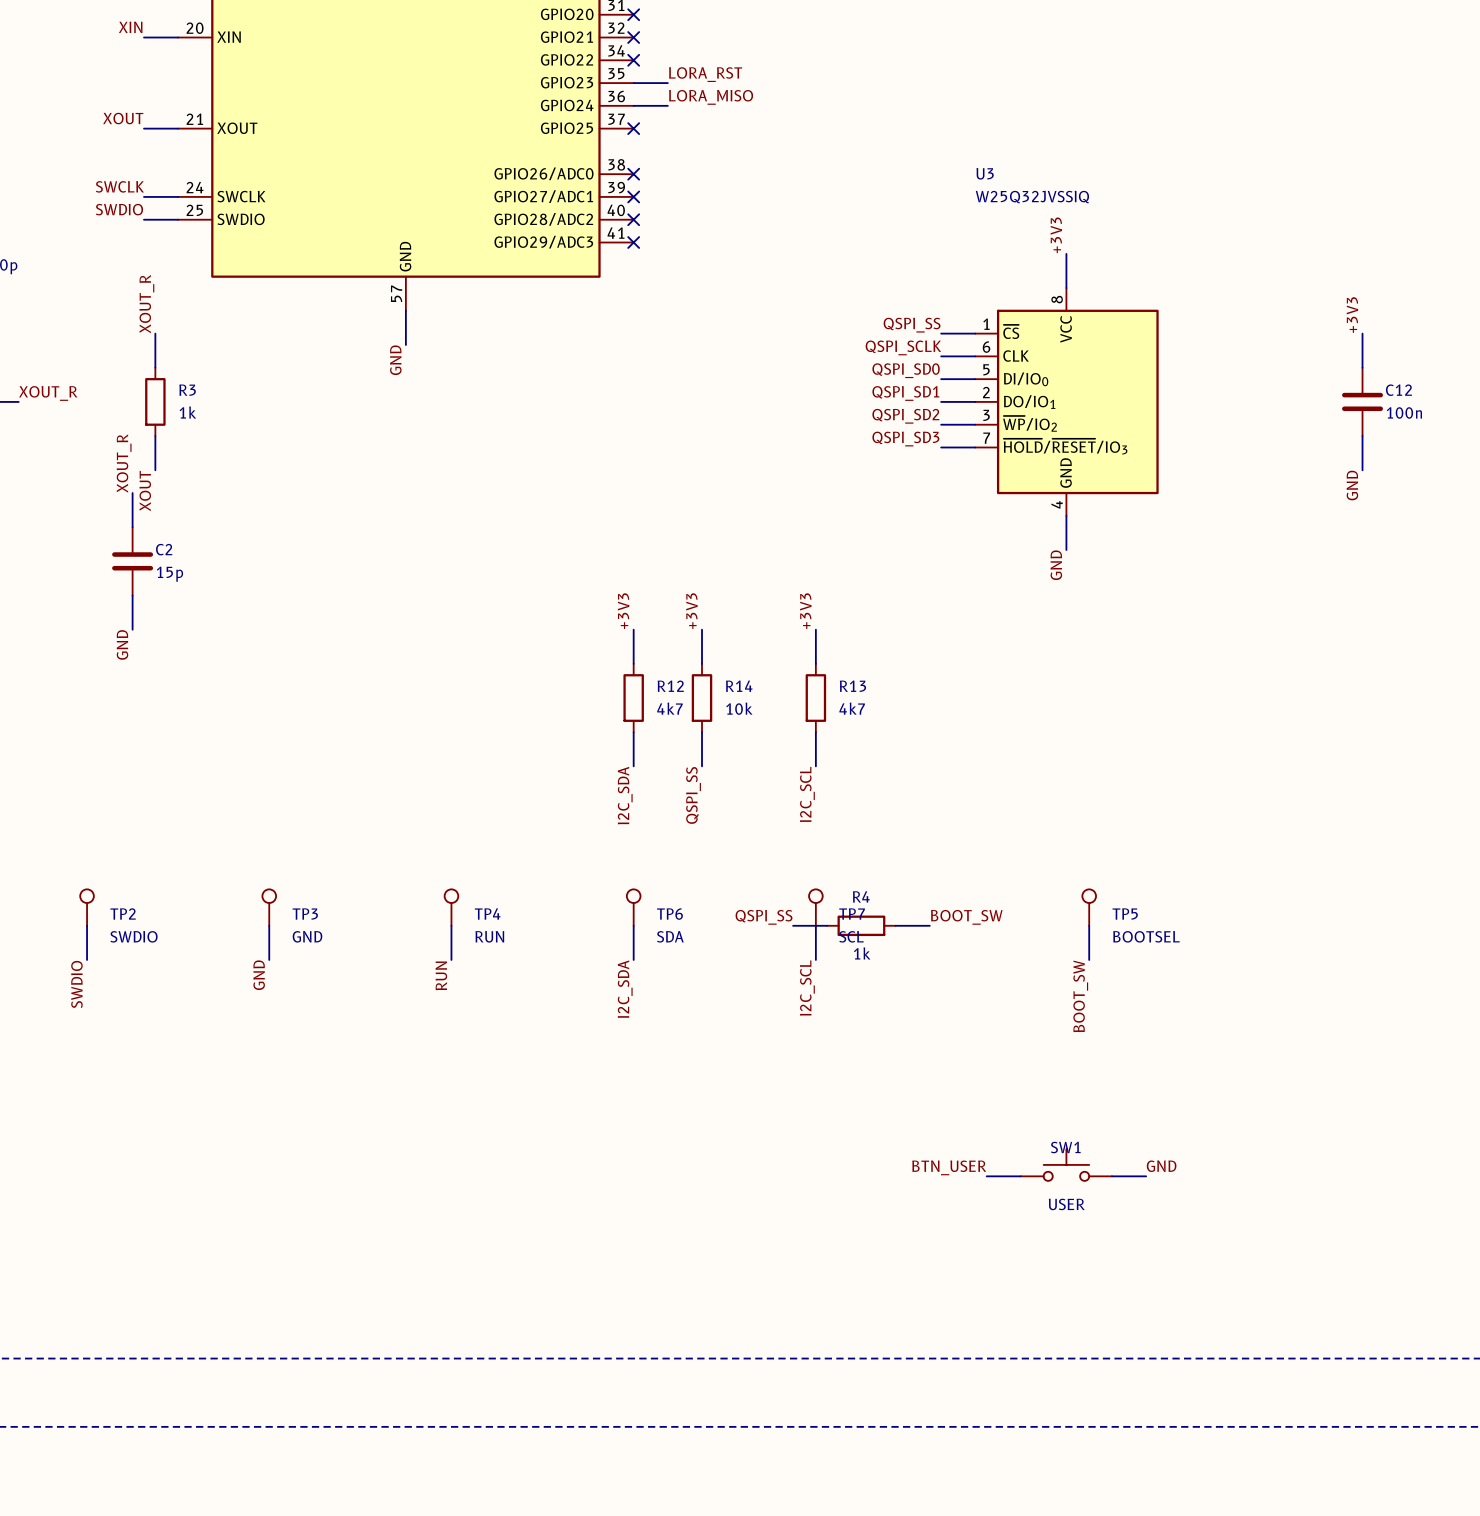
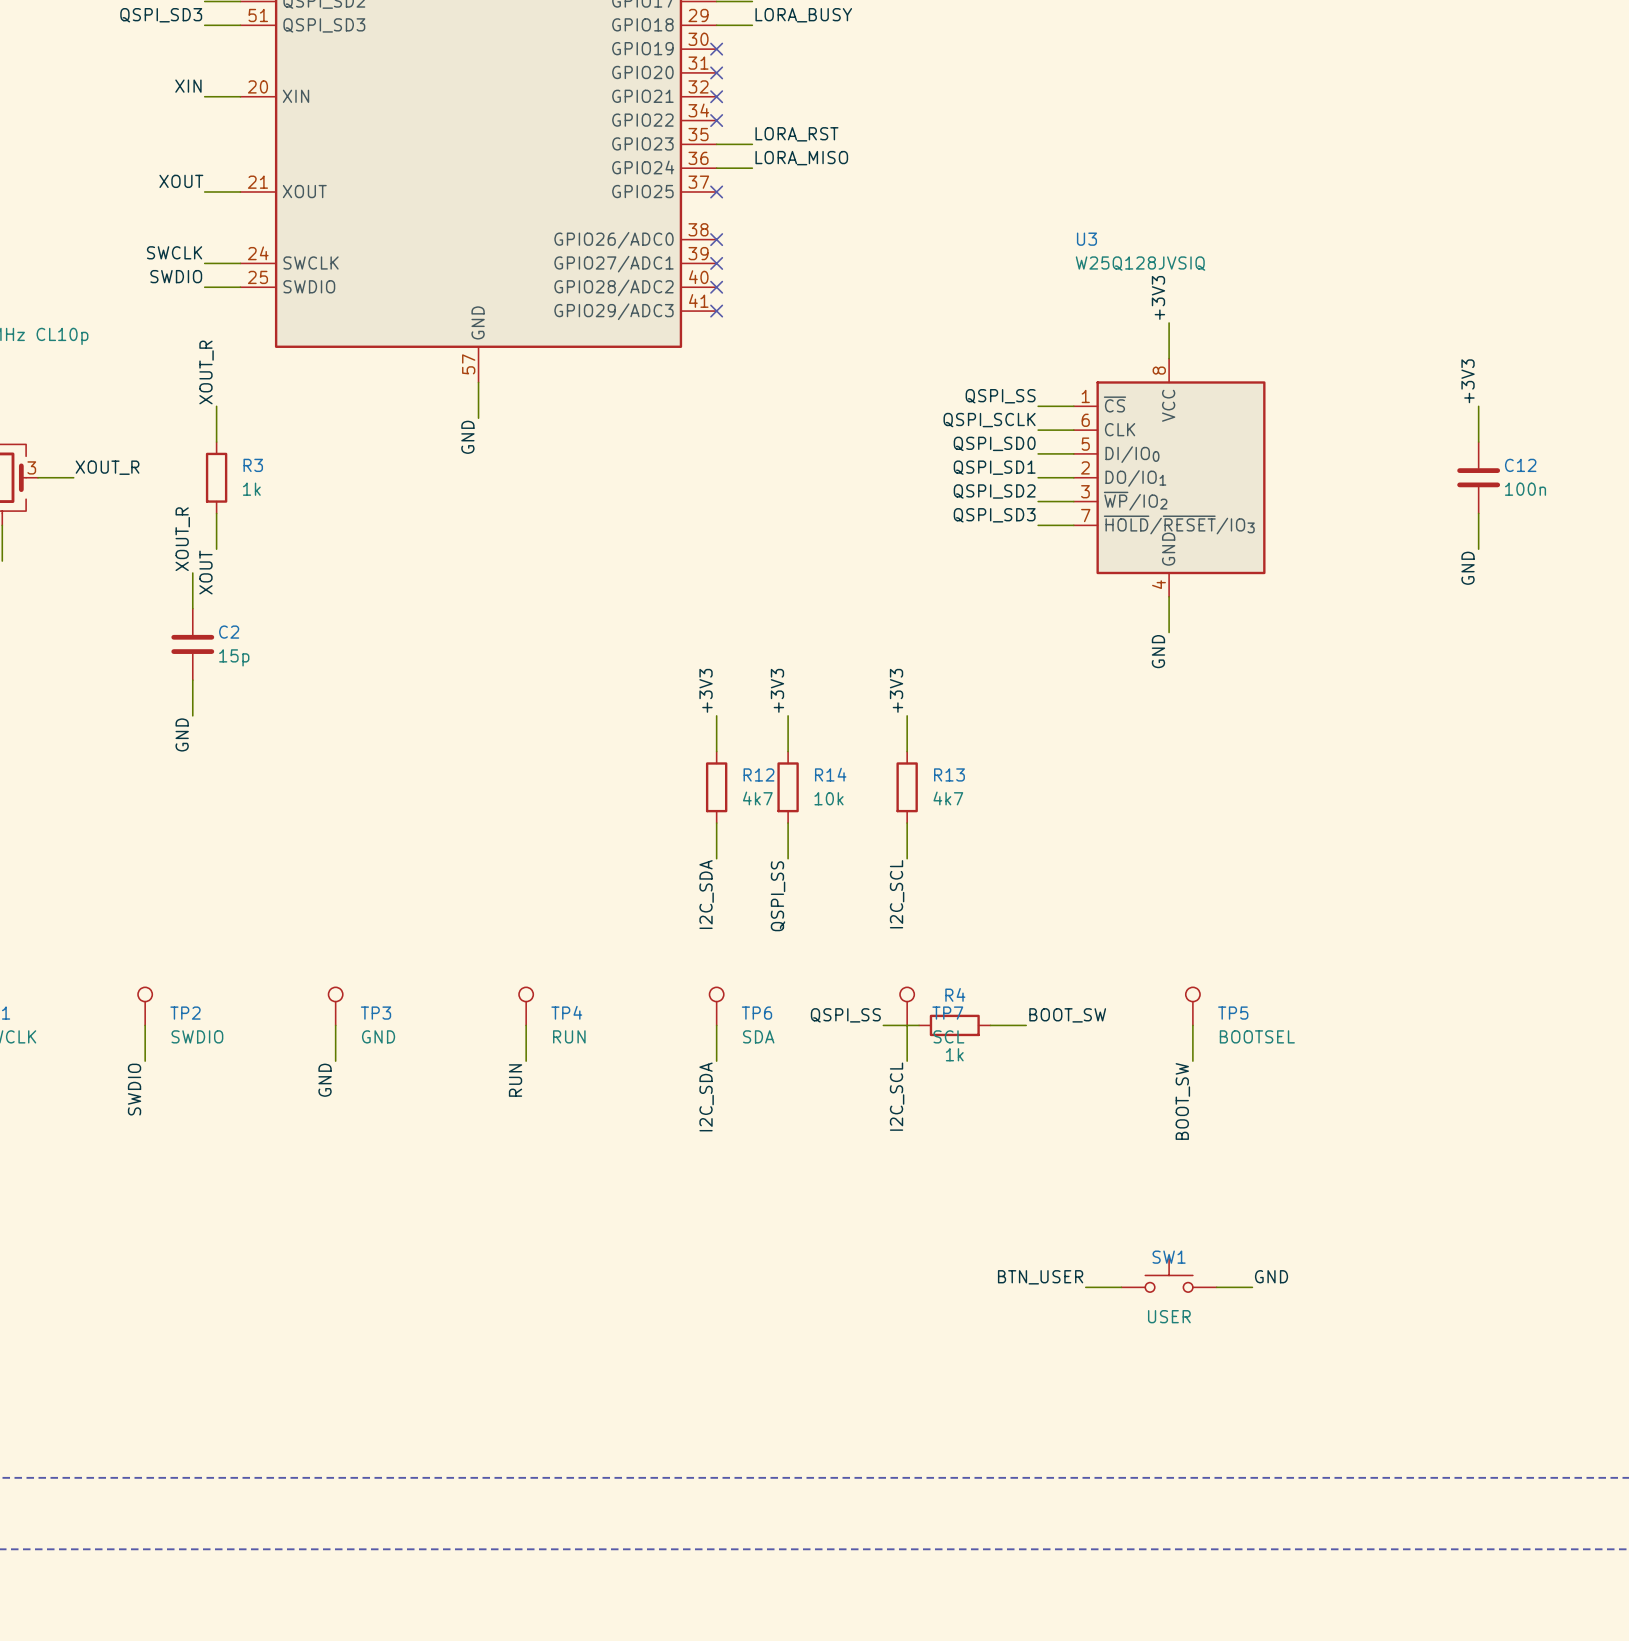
U3 value: W25Q32JVSSIQ (1032, 197) -> W25Q128JVSIQ (1140, 263)

